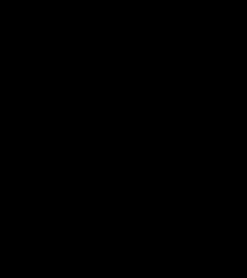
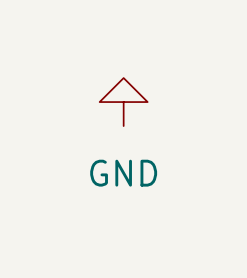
power symbol: none -> GND (123, 102)

